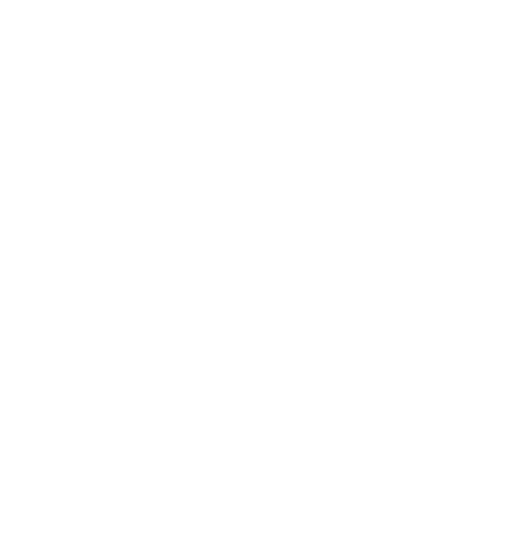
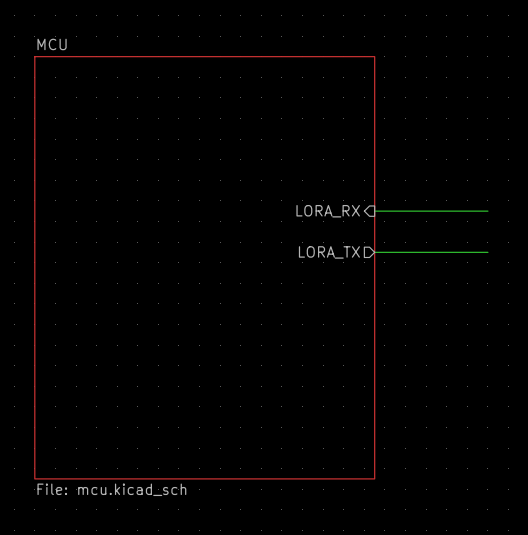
wire: none -> (374, 211) (487, 211)
sheet pin: none -> LORA_RX (328, 211)
wire: none -> (374, 252) (487, 252)
sheet pin: none -> LORA_TX (329, 252)
sheet MCU: none -> File: mcu.kicad_sch (204, 267)

